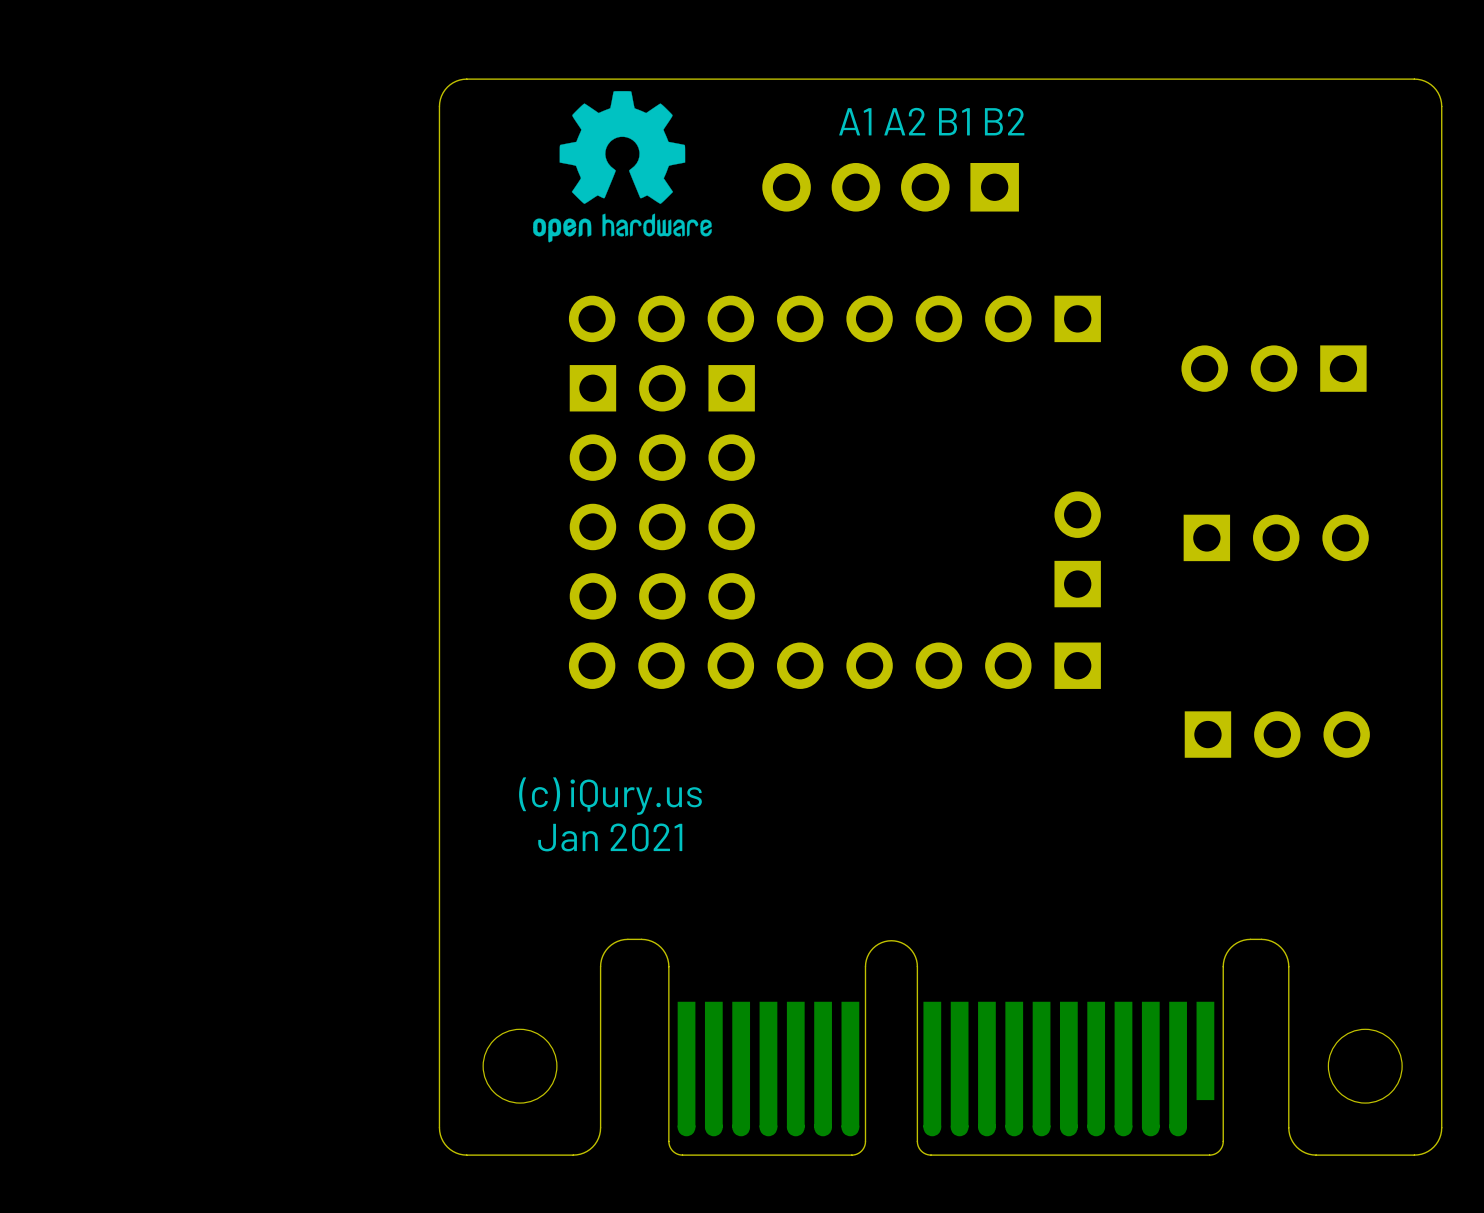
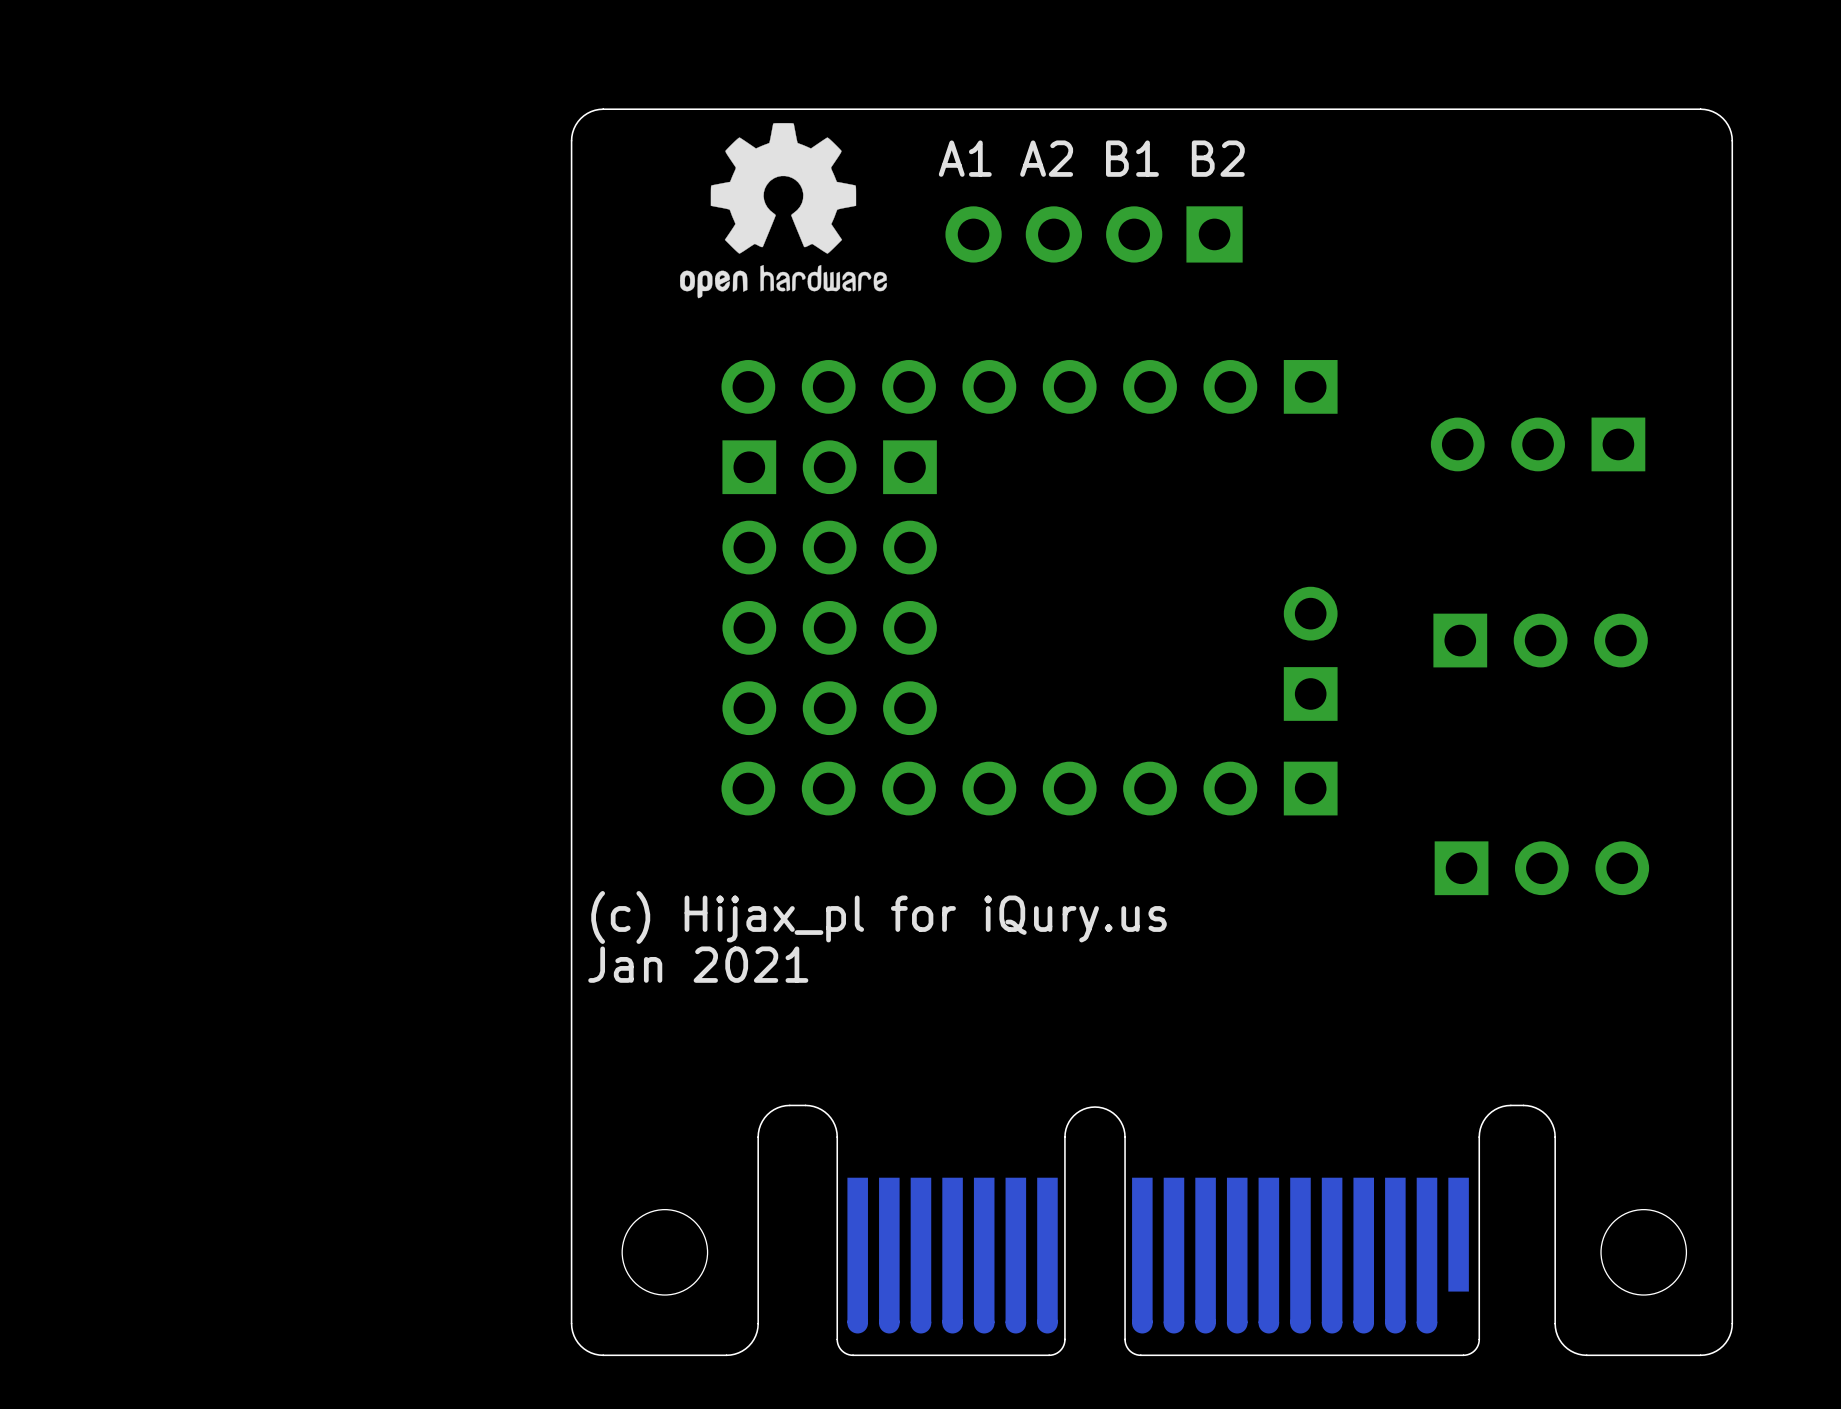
text: (c) iQury.us (610, 796) -> (c) Hijax_pl for iQury.us (879, 917)
text position: Jan 2021 (610, 837) -> Jan 2021 (698, 964)

